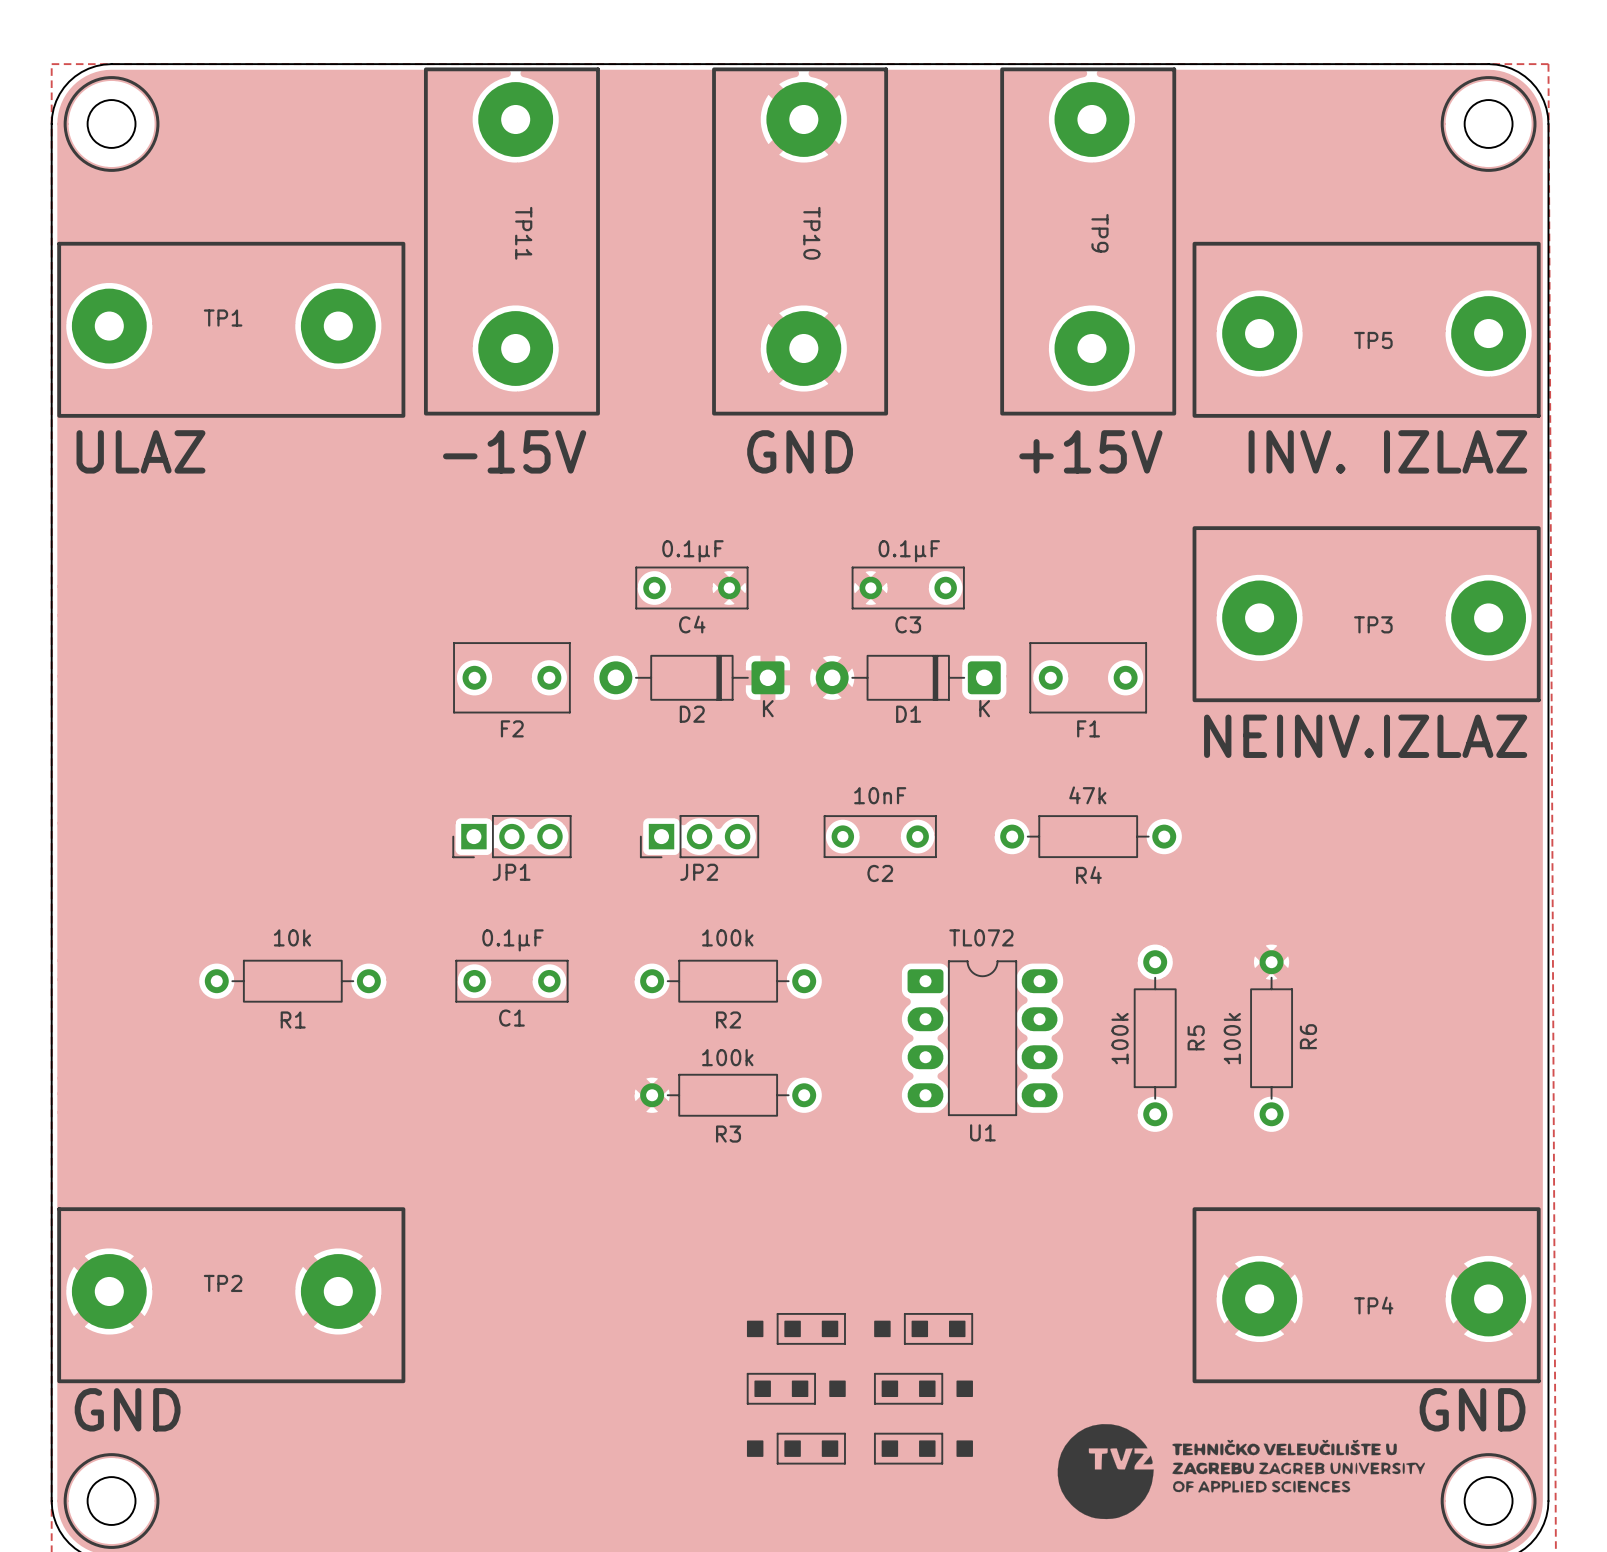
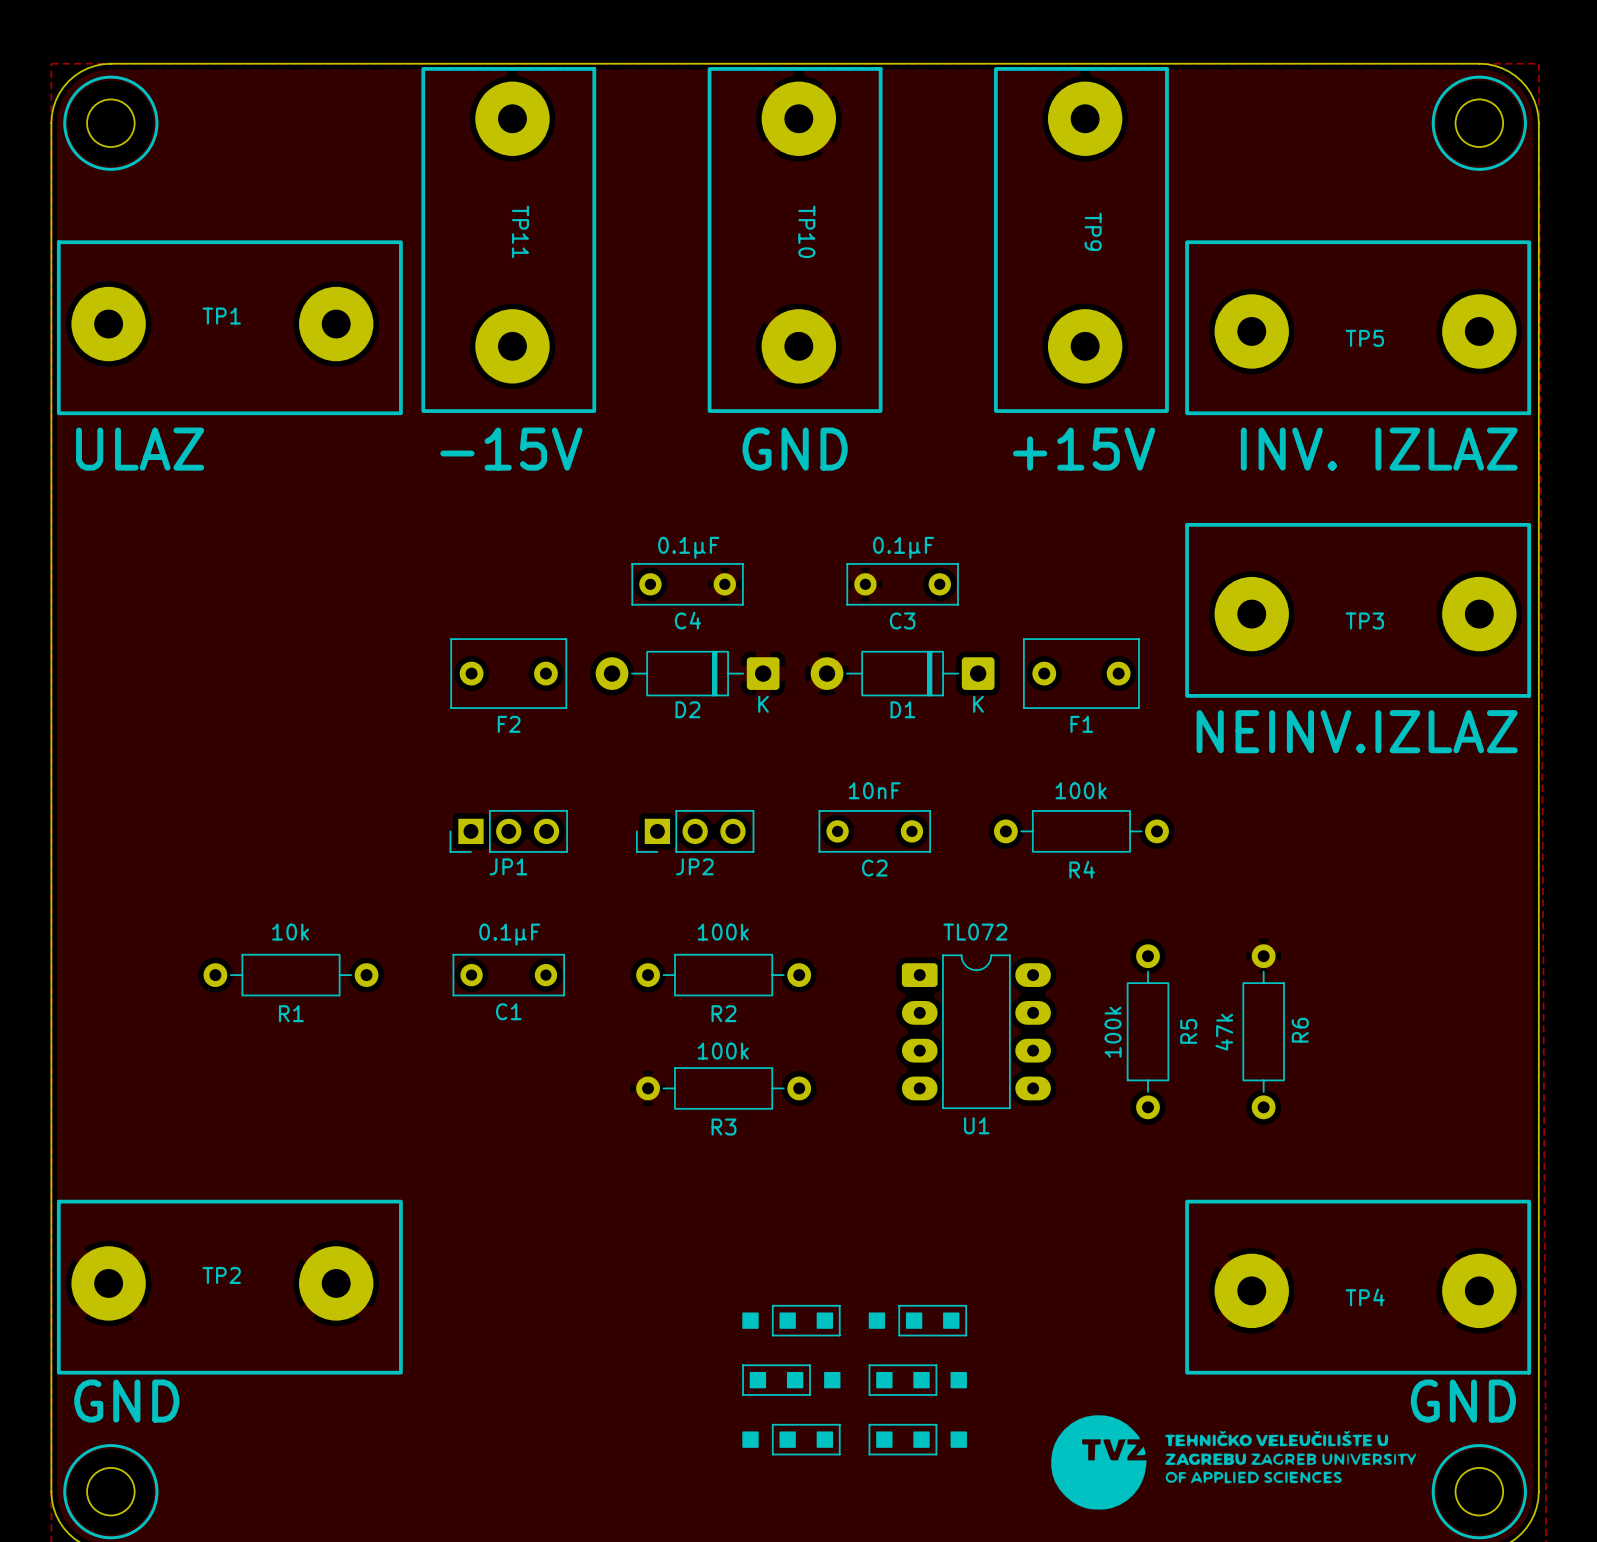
text rotation: 0° (1087, 795) -> 90° counterclockwise (1224, 1032)
text position: 47k (1087, 795) -> 47k (1224, 1032)
text rotation: 0° (1232, 1038) -> 90° clockwise (1081, 790)
text position: 100k (1232, 1038) -> 100k (1081, 790)

